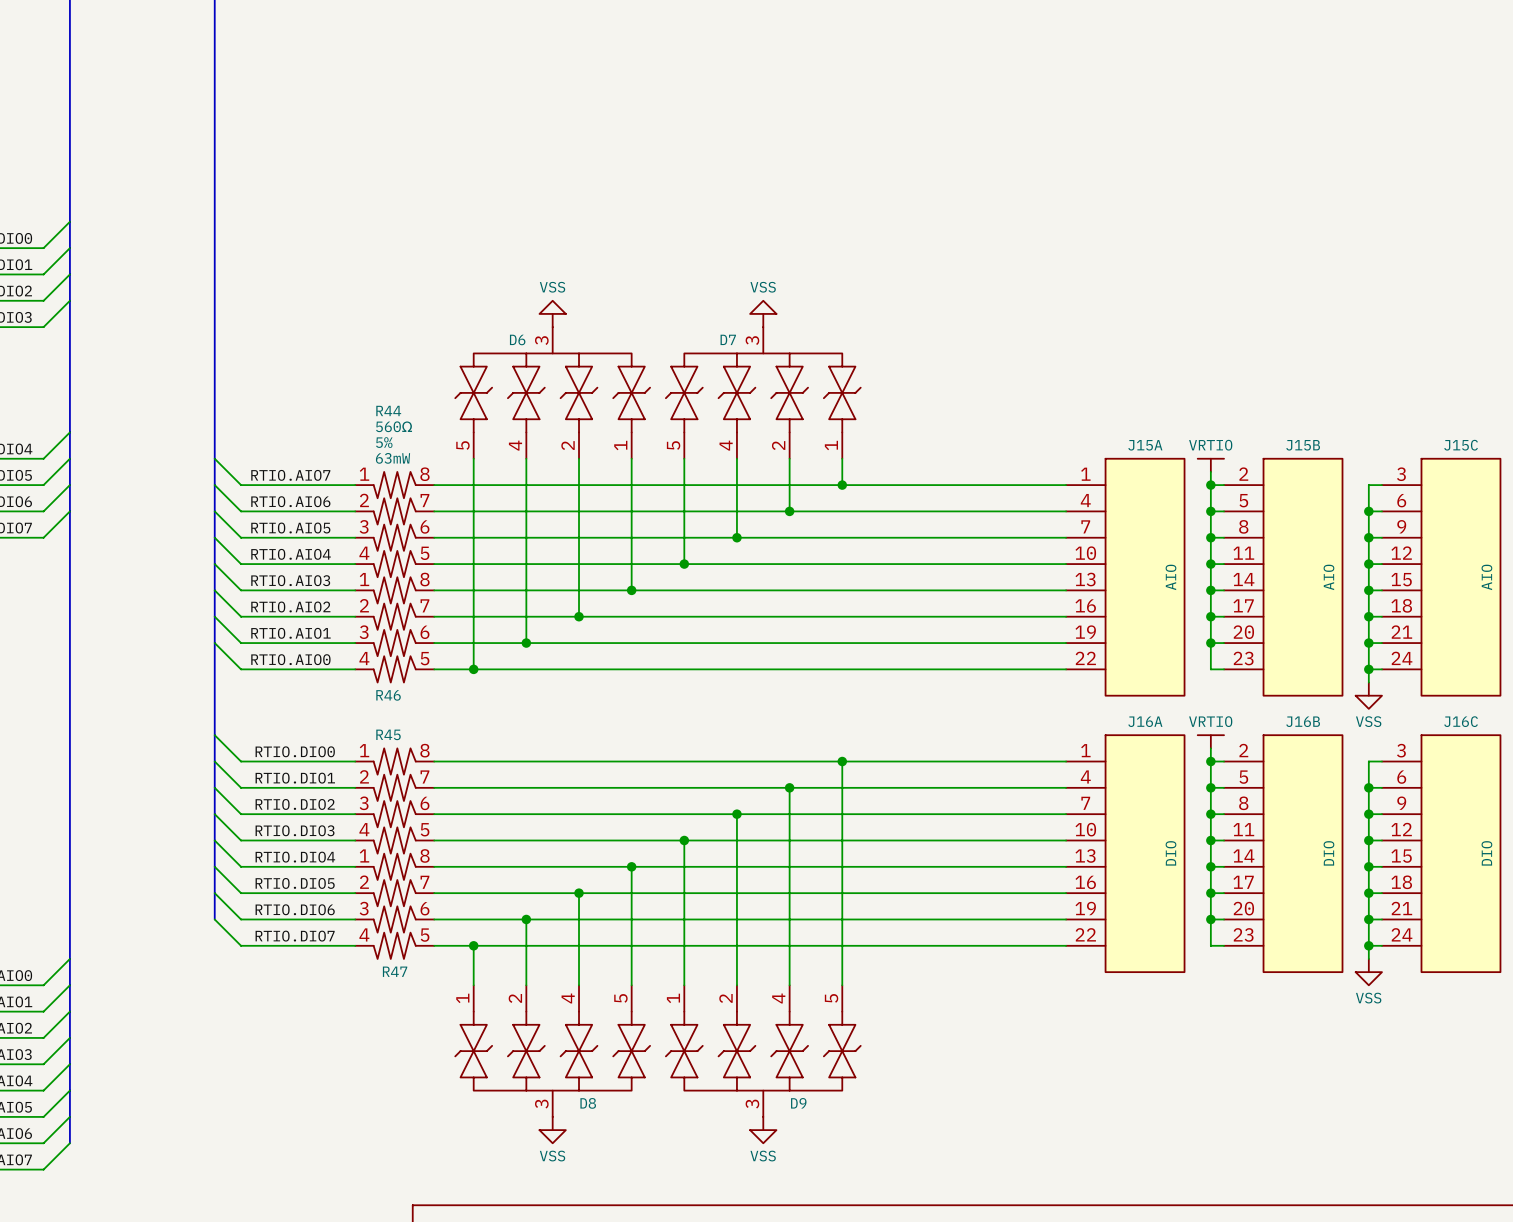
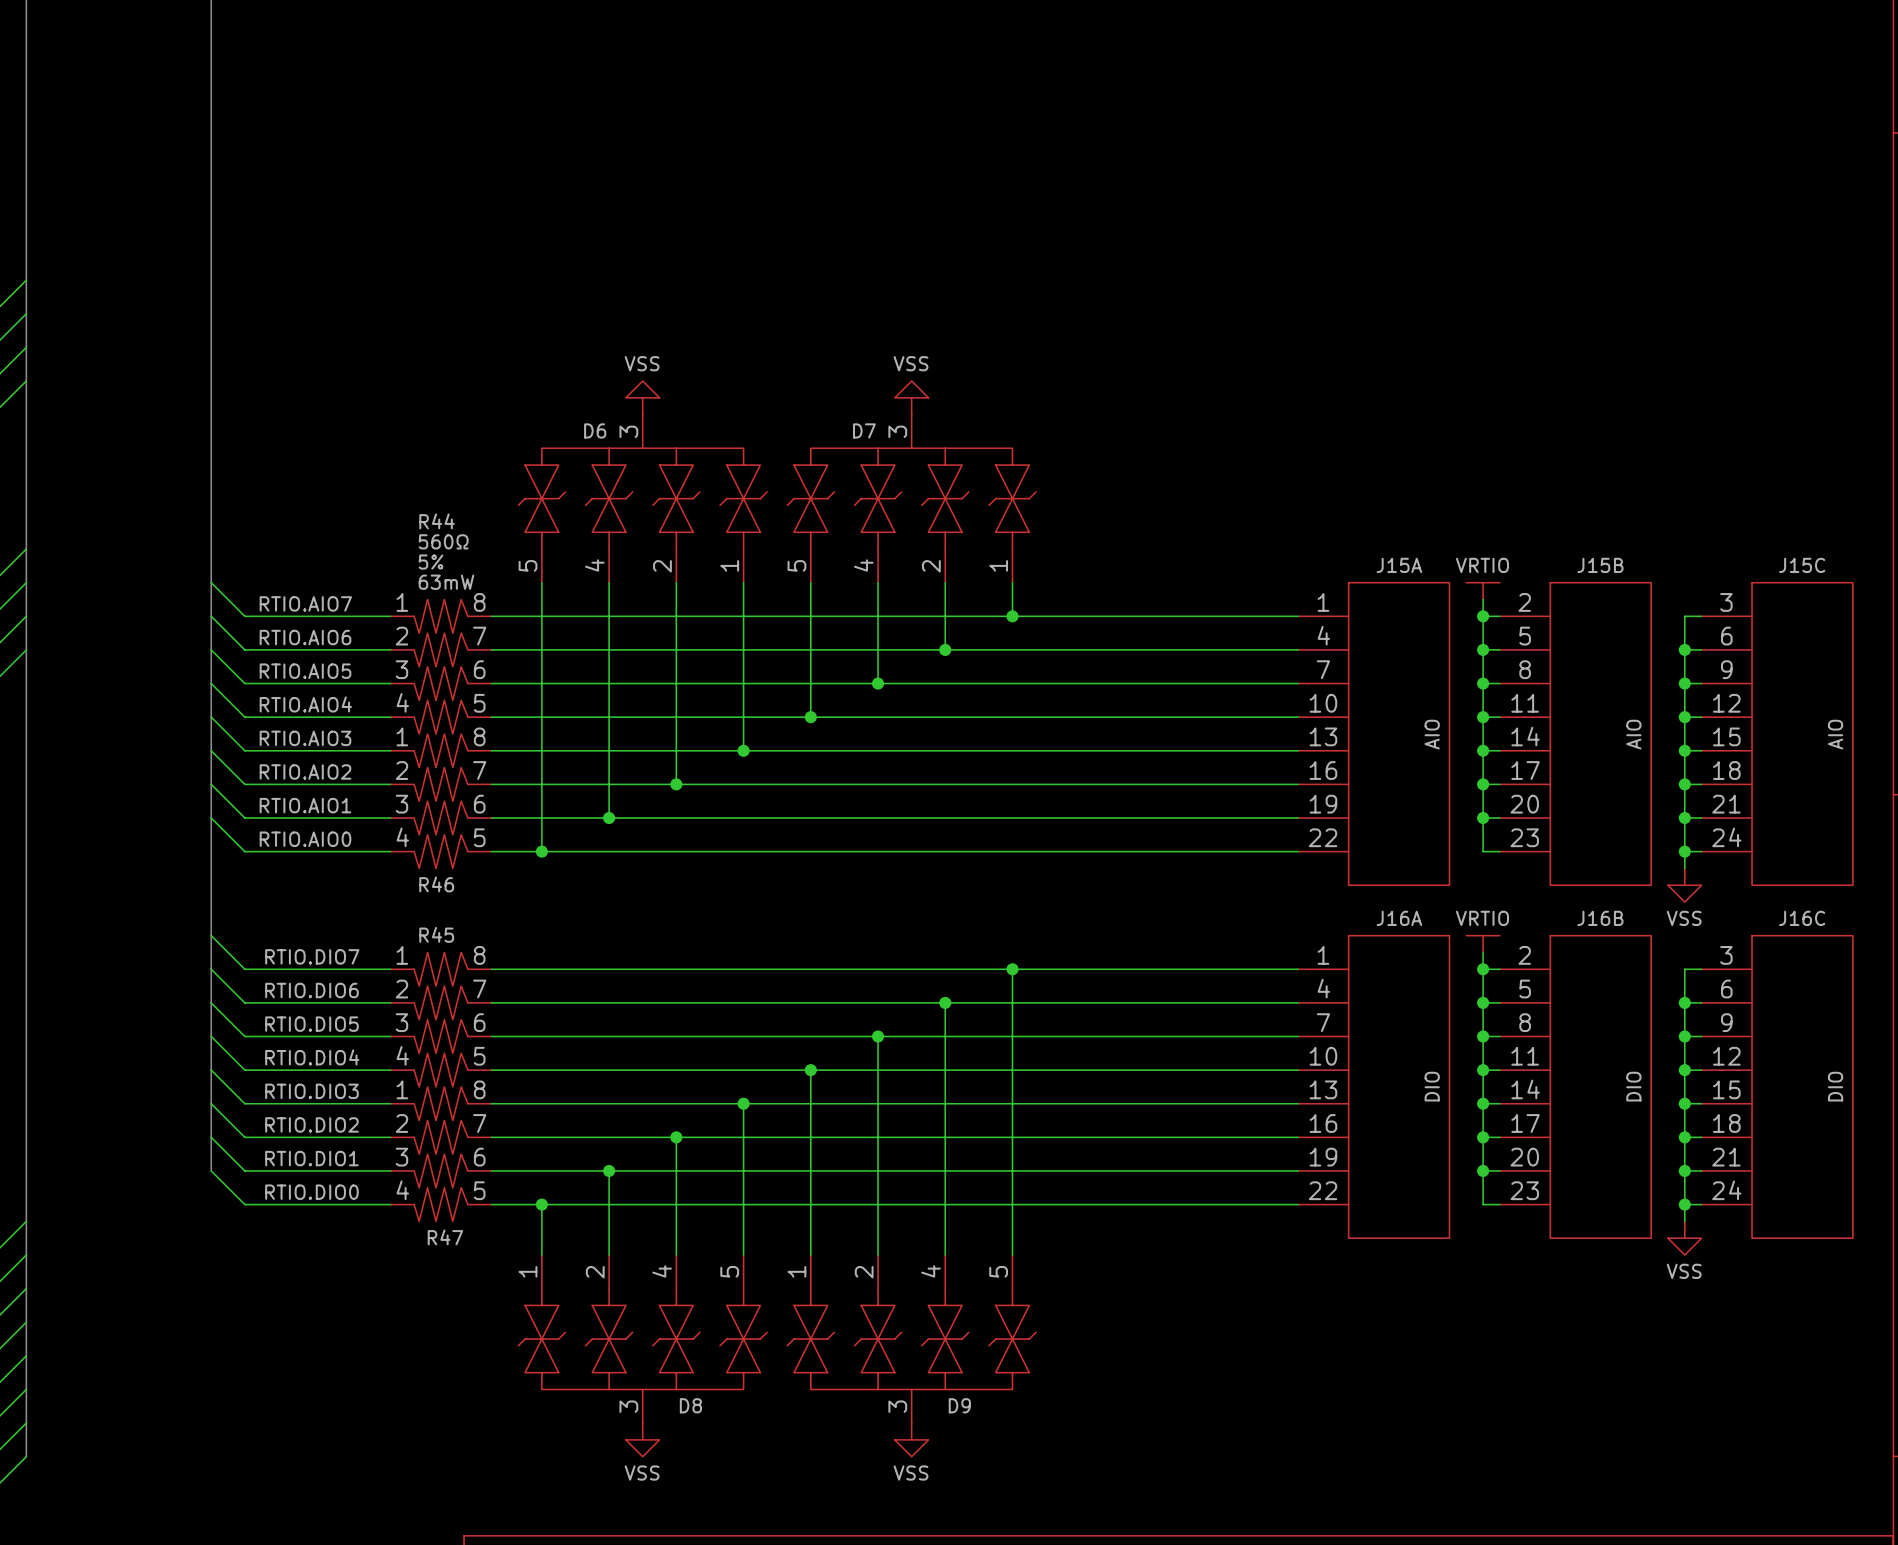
label: RTIO.DIO0 (295, 751) -> RTIO.DIO7 (312, 956)
label: RTIO.DIO1 (295, 778) -> RTIO.DIO6 (311, 990)
label: RTIO.DIO2 (295, 804) -> RTIO.DIO5 (311, 1024)
label: RTIO.DIO3 (295, 830) -> RTIO.DIO4 (312, 1057)
label: RTIO.DIO4 (295, 857) -> RTIO.DIO3 (311, 1091)
label: RTIO.DIO5 (295, 883) -> RTIO.DIO2 (311, 1124)
label: RTIO.DIO6 (295, 909) -> RTIO.DIO1 (311, 1158)
label: RTIO.DIO7 (295, 936) -> RTIO.DIO0 (311, 1192)

